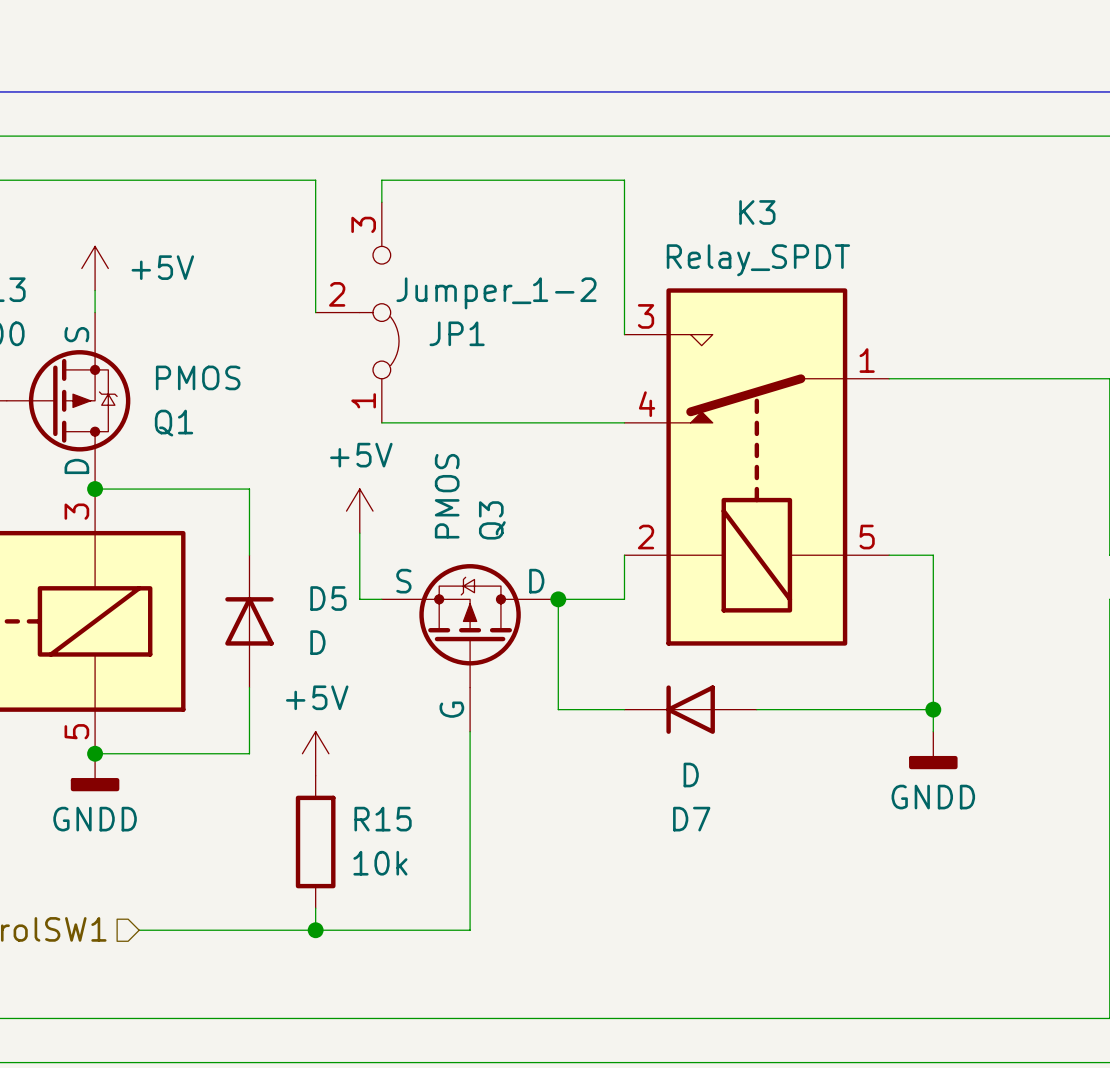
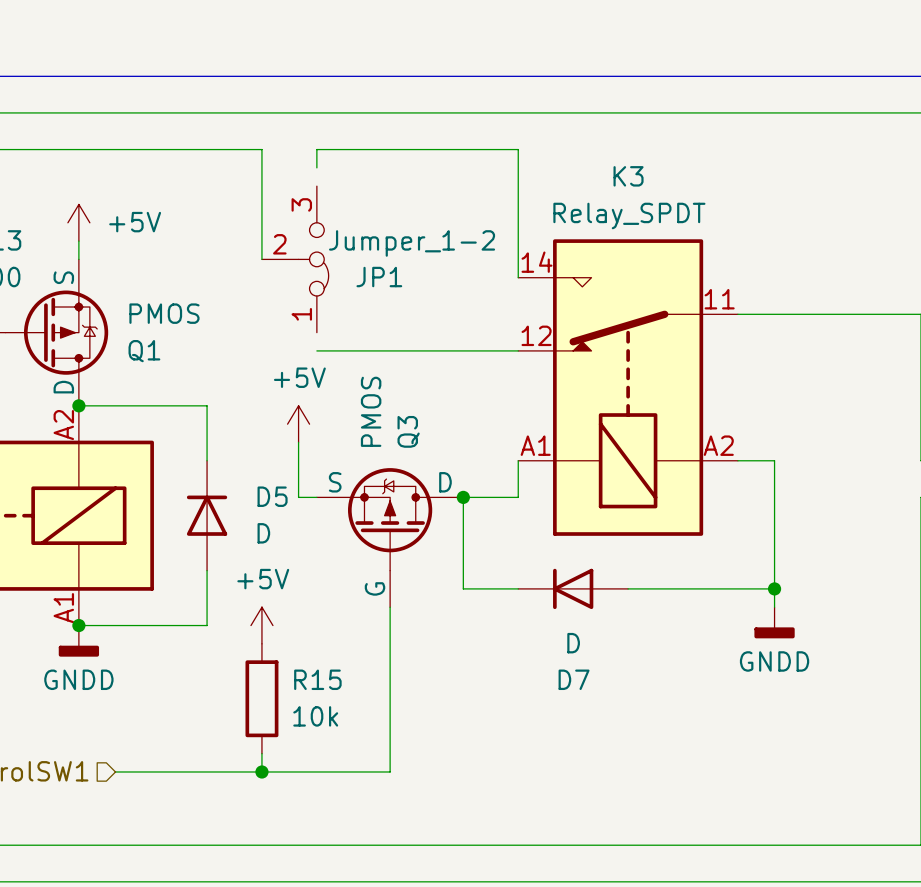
JP1 symbol: [315, 202, 400, 423] -> [261, 186, 329, 333]
K3 pin number: 3 (646, 316) -> 14 (537, 262)
K3 pin number: 1 (867, 360) -> 11 (719, 299)
K3 pin number: 4 (647, 404) -> 12 (536, 335)
part pin number: 3 (76, 511) -> A2 (63, 425)
K3 pin number: 2 (646, 537) -> A1 (535, 445)
K3 pin number: 5 (867, 537) -> A2 (718, 445)
part pin number: 5 (76, 731) -> A1 (63, 608)

